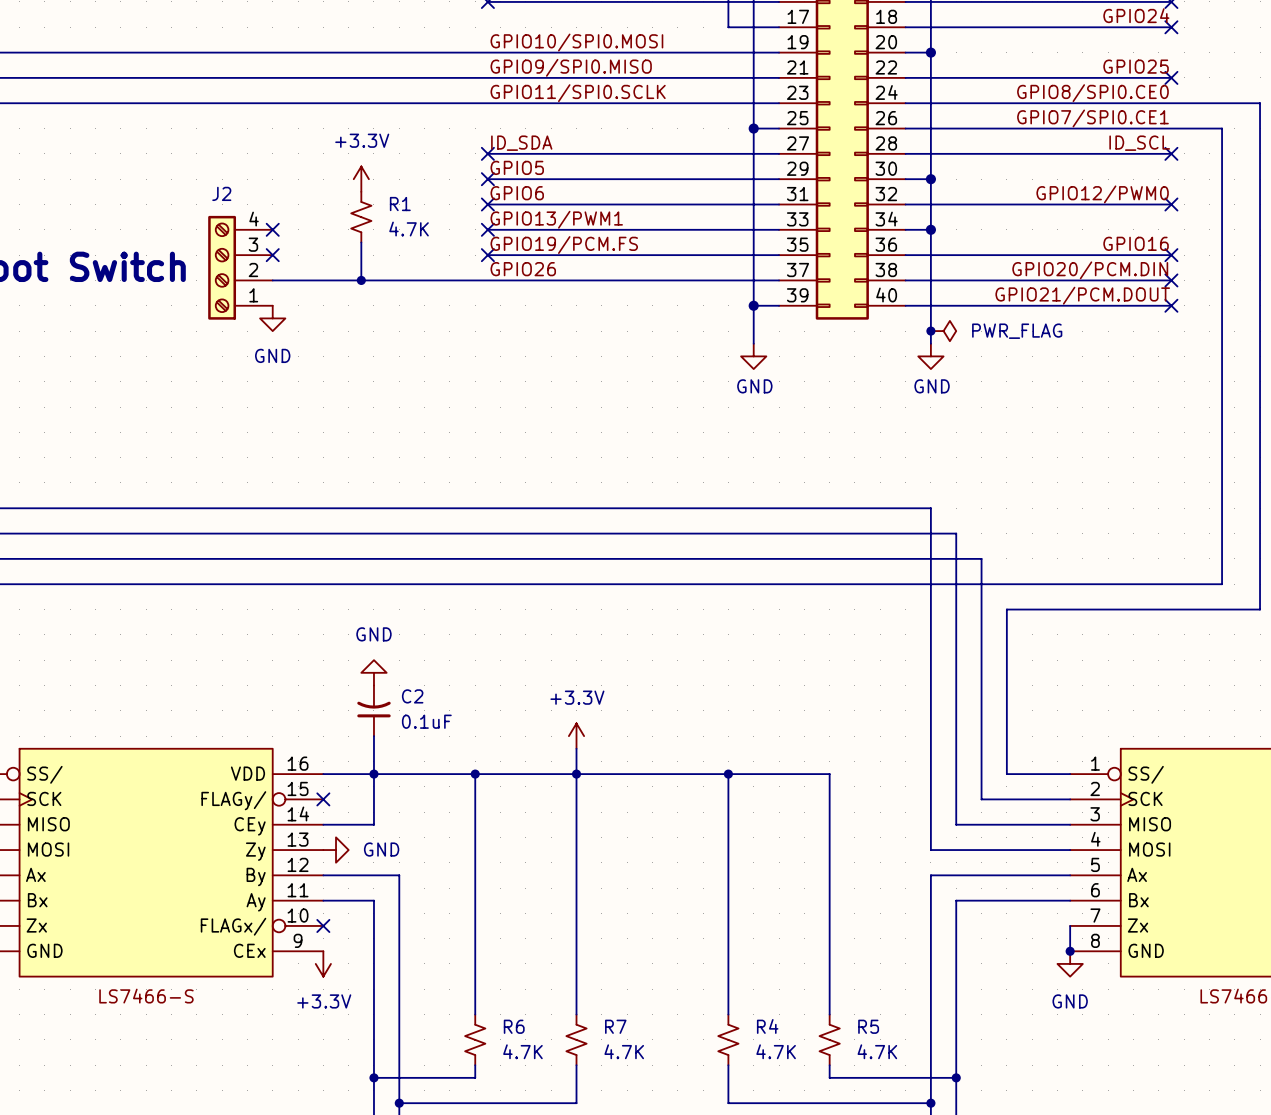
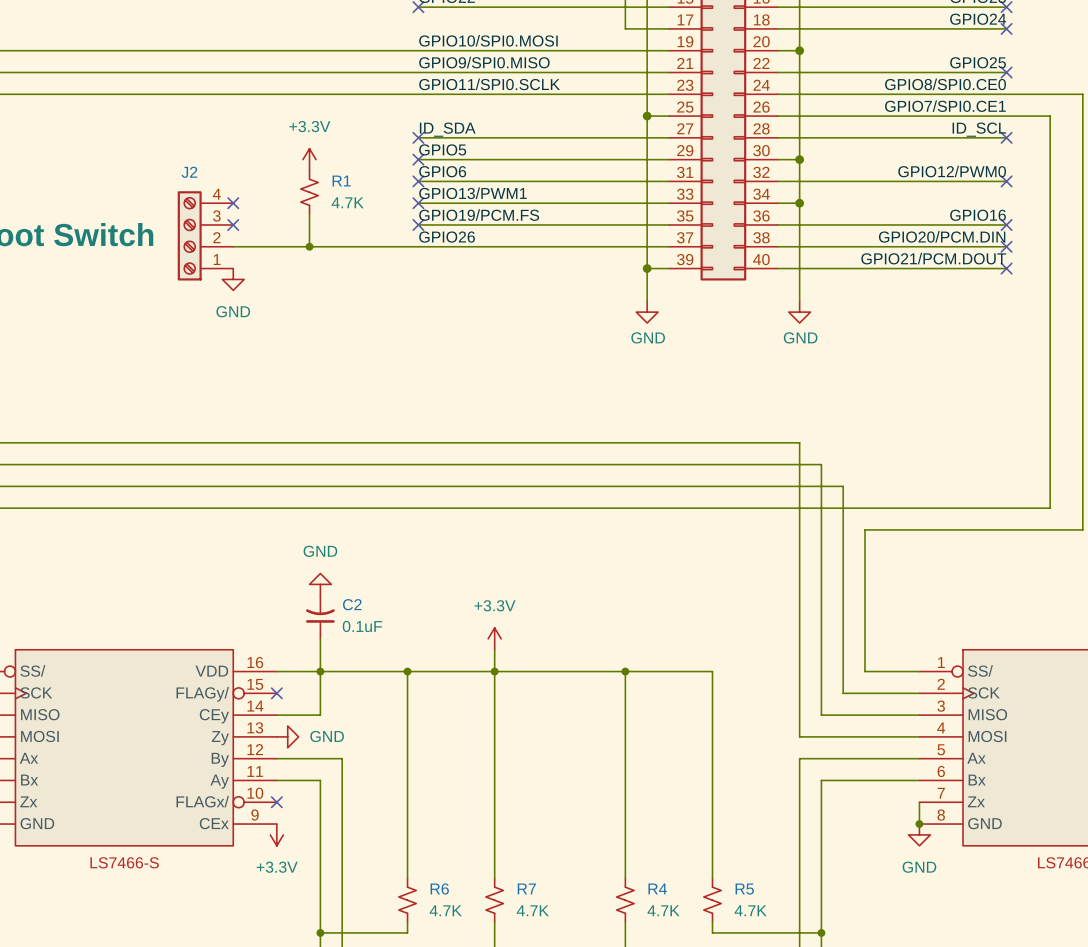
junction: (930, 331) -> none
power symbol: PWR_FLAG (943, 331) -> none

